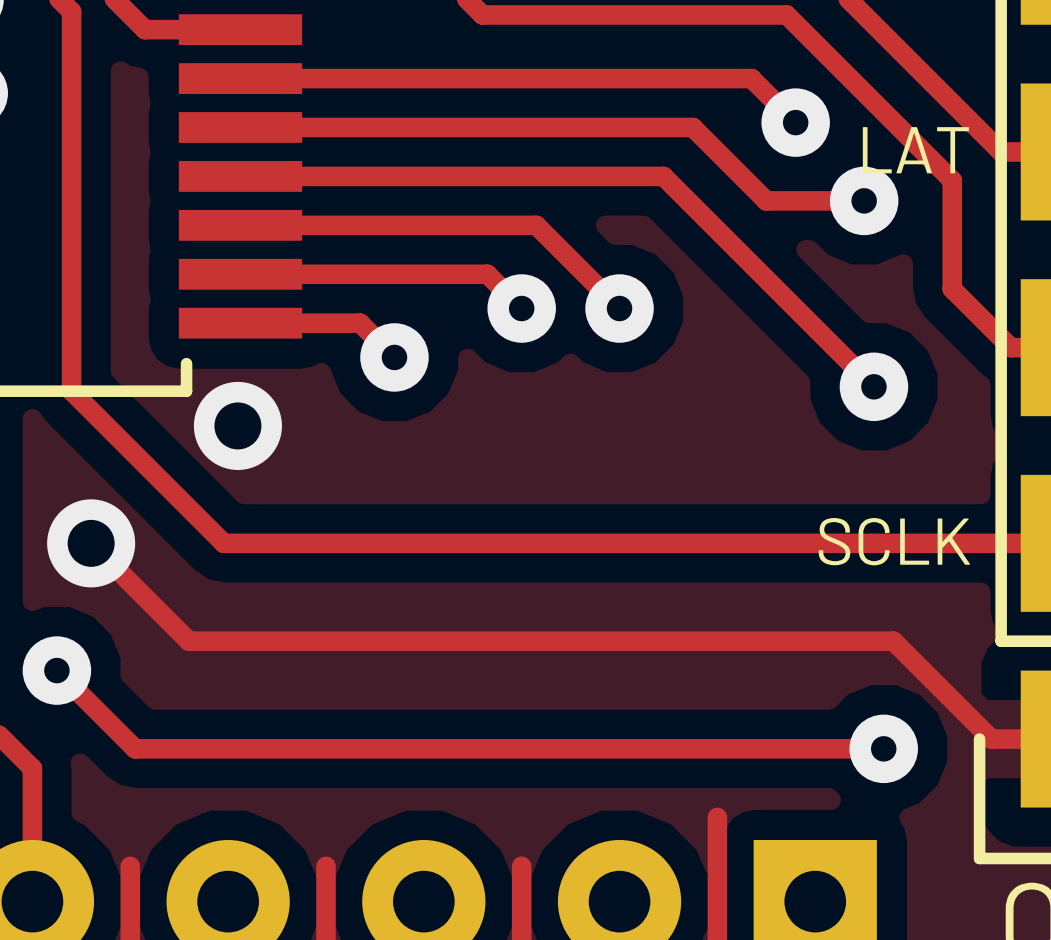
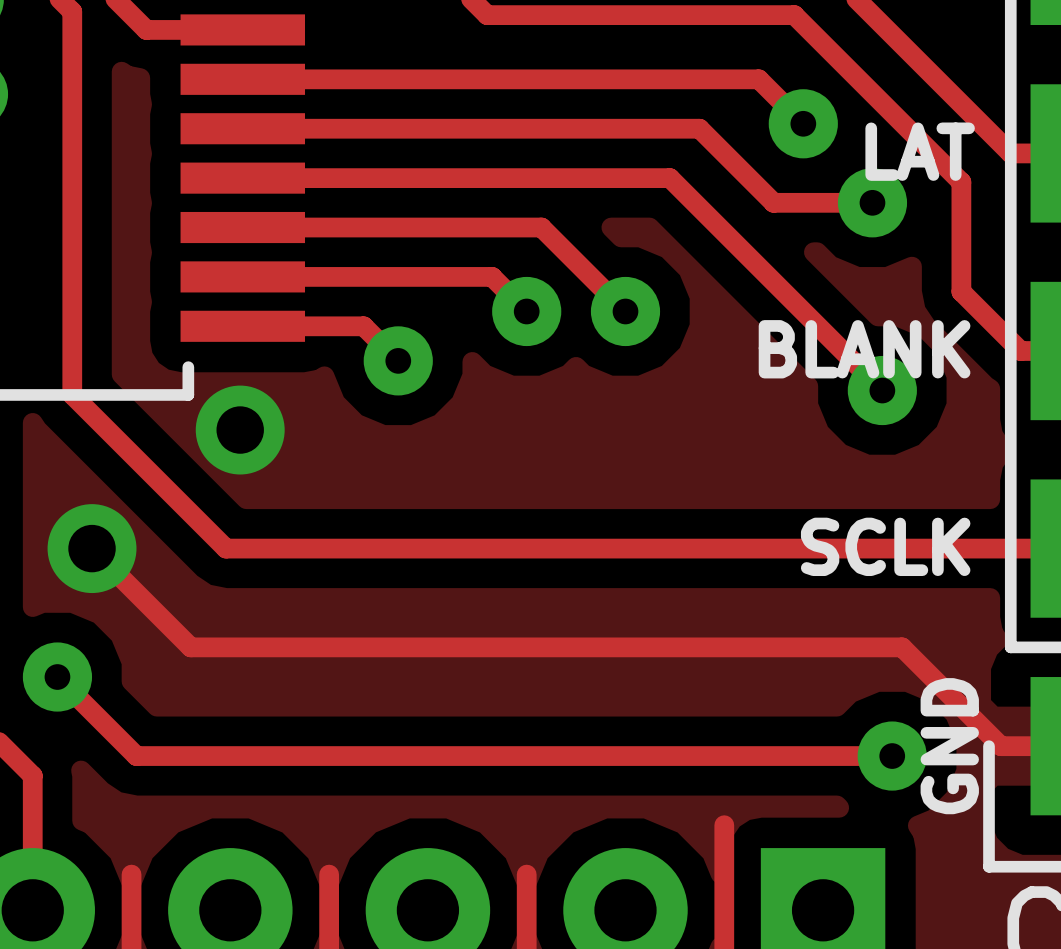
text: none -> BLANK (864, 349)
text: none -> GND (949, 746)

